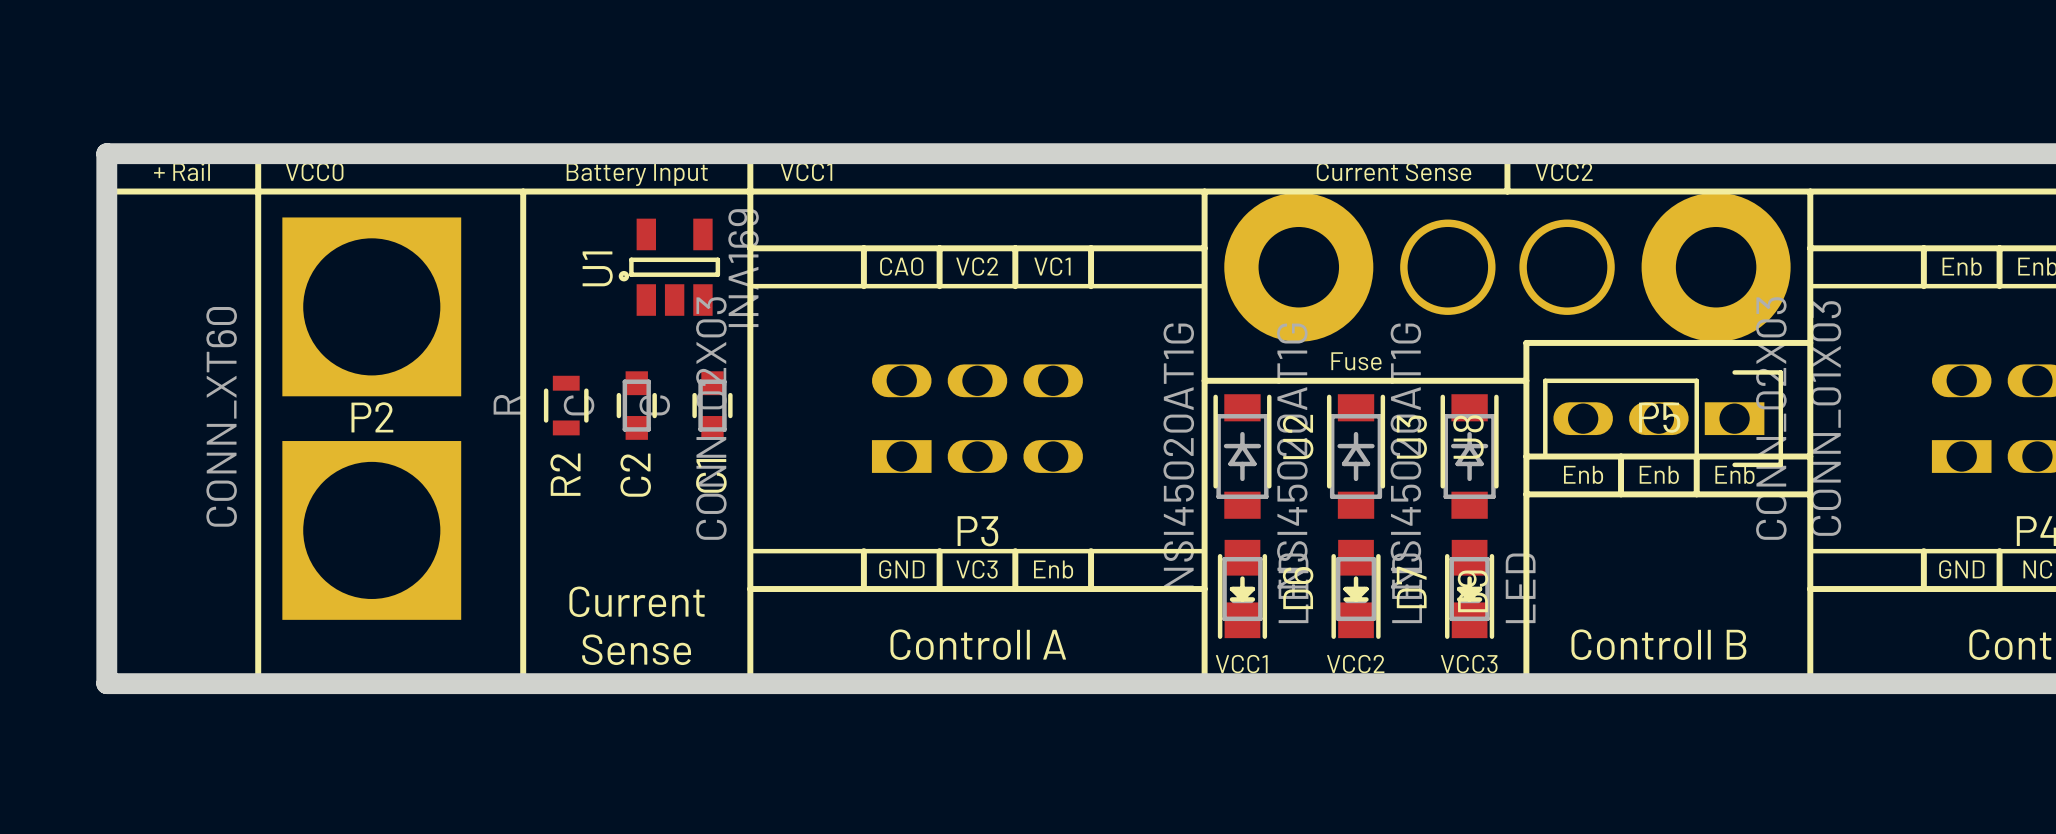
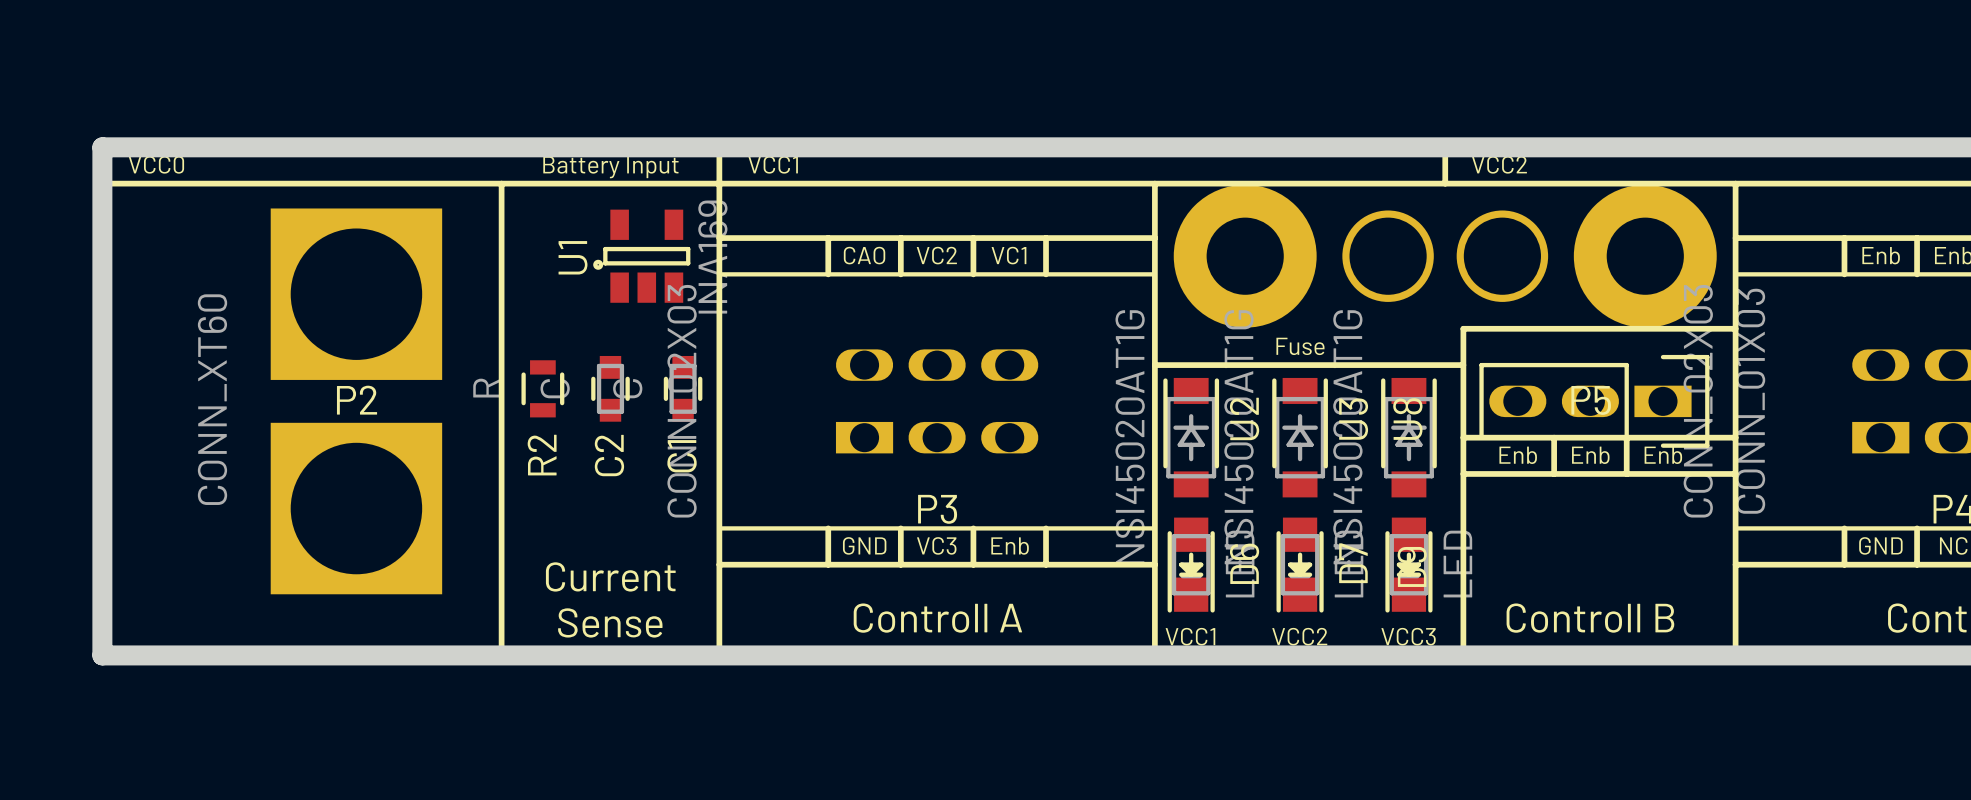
line: (258, 153) (258, 683) -> none
text: + Rail (181, 171) -> VCC0 (156, 164)
text: VCC0 (314, 171) -> none
text: Current Sense (1394, 171) -> none

